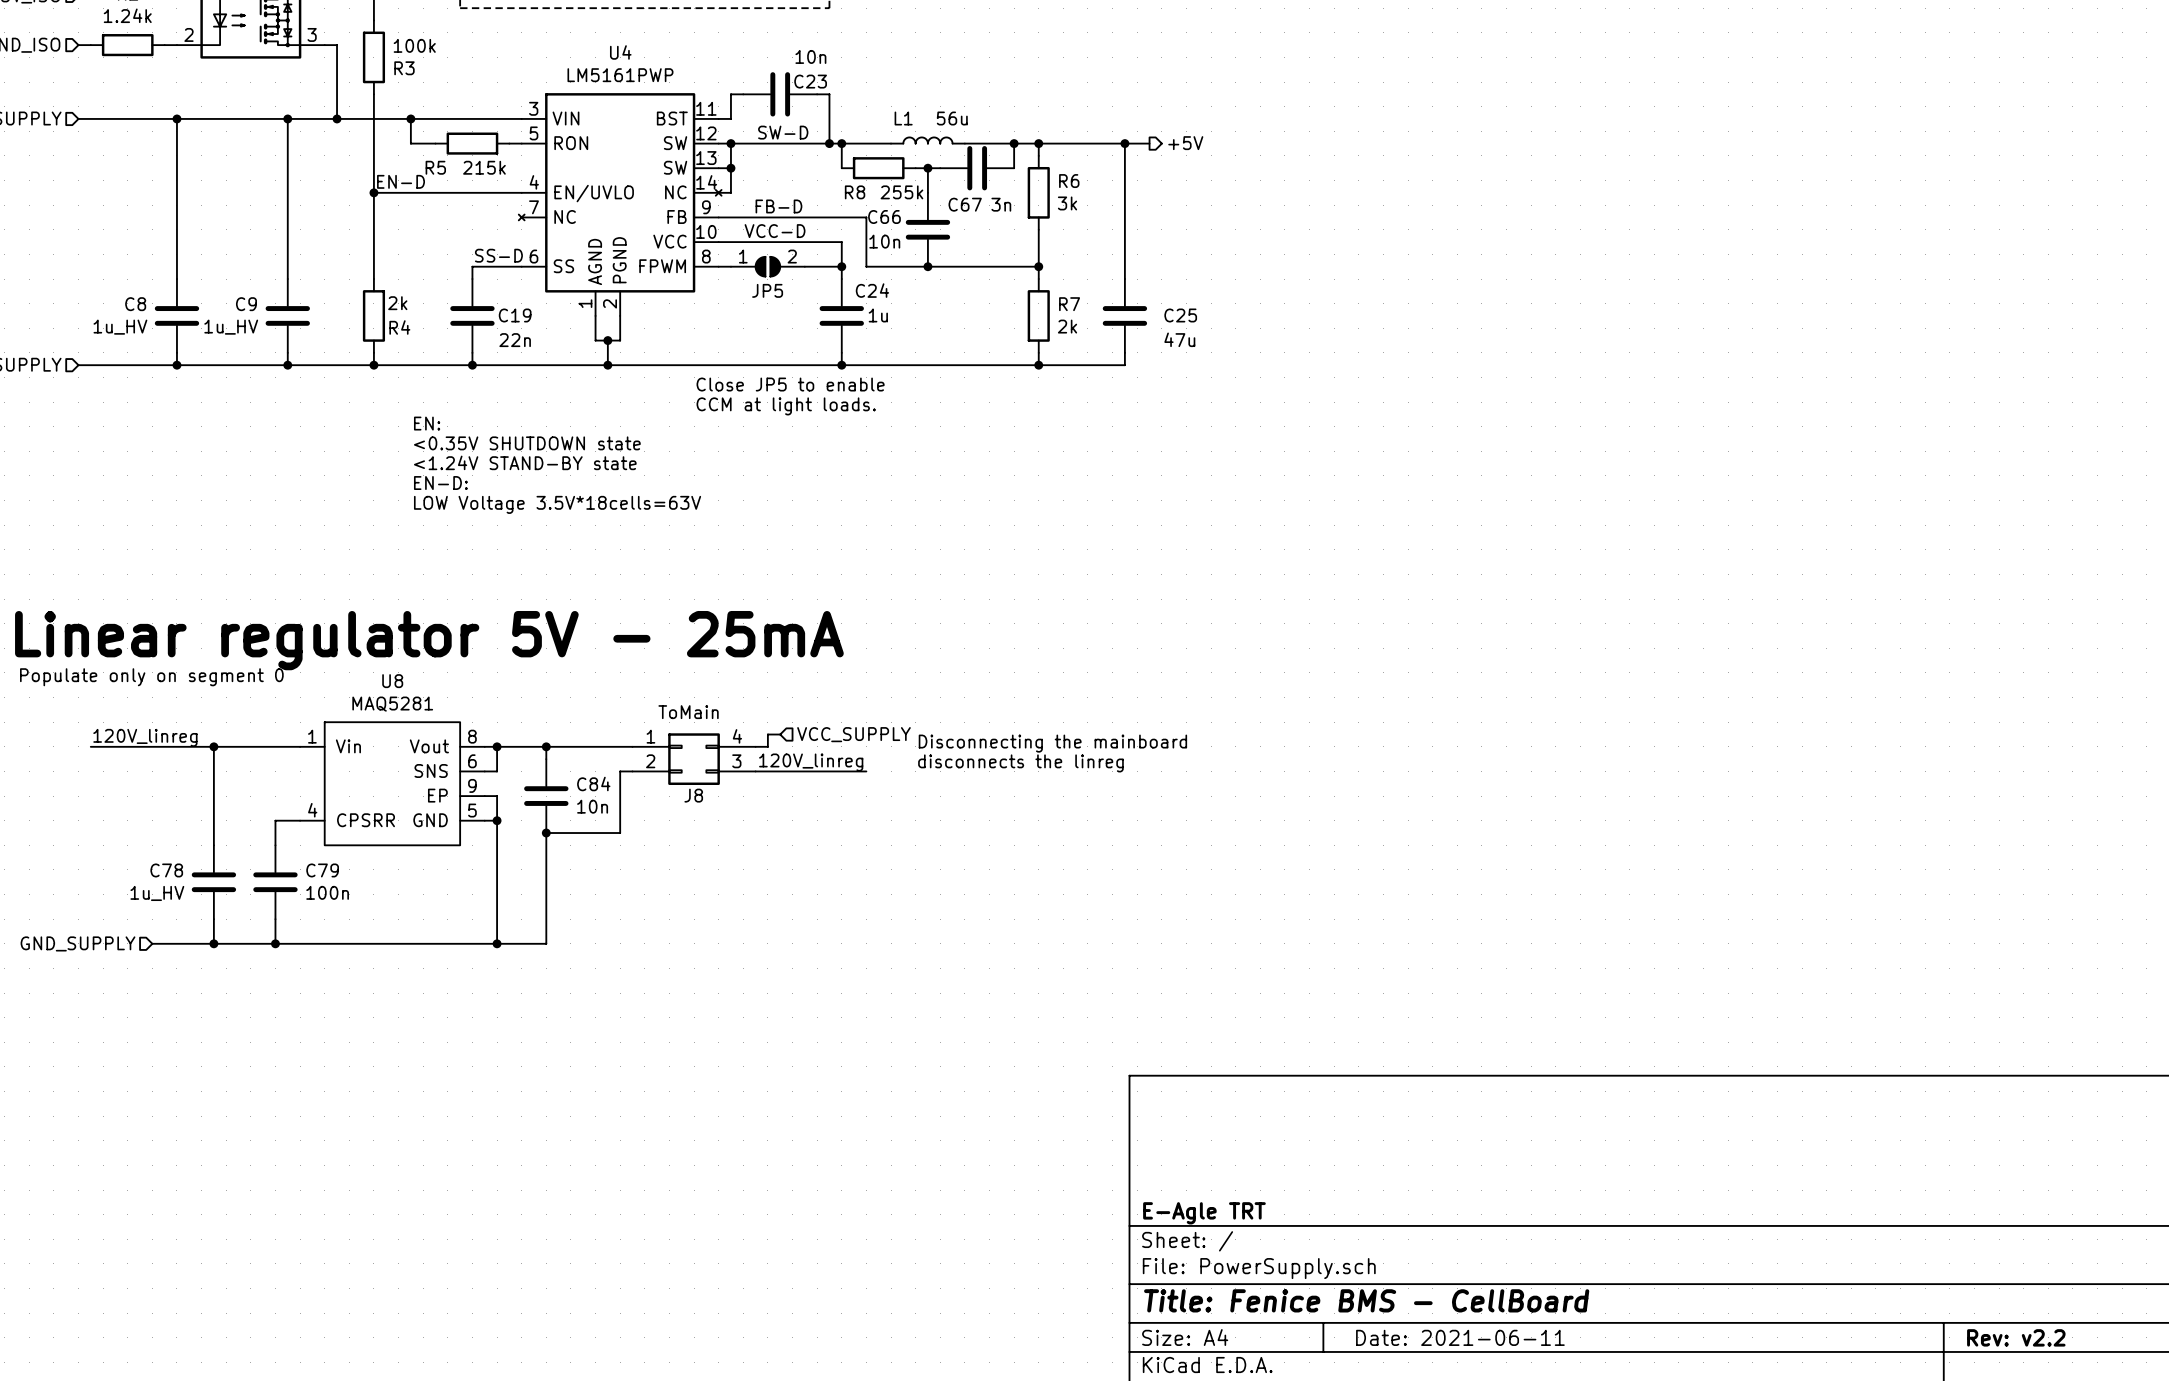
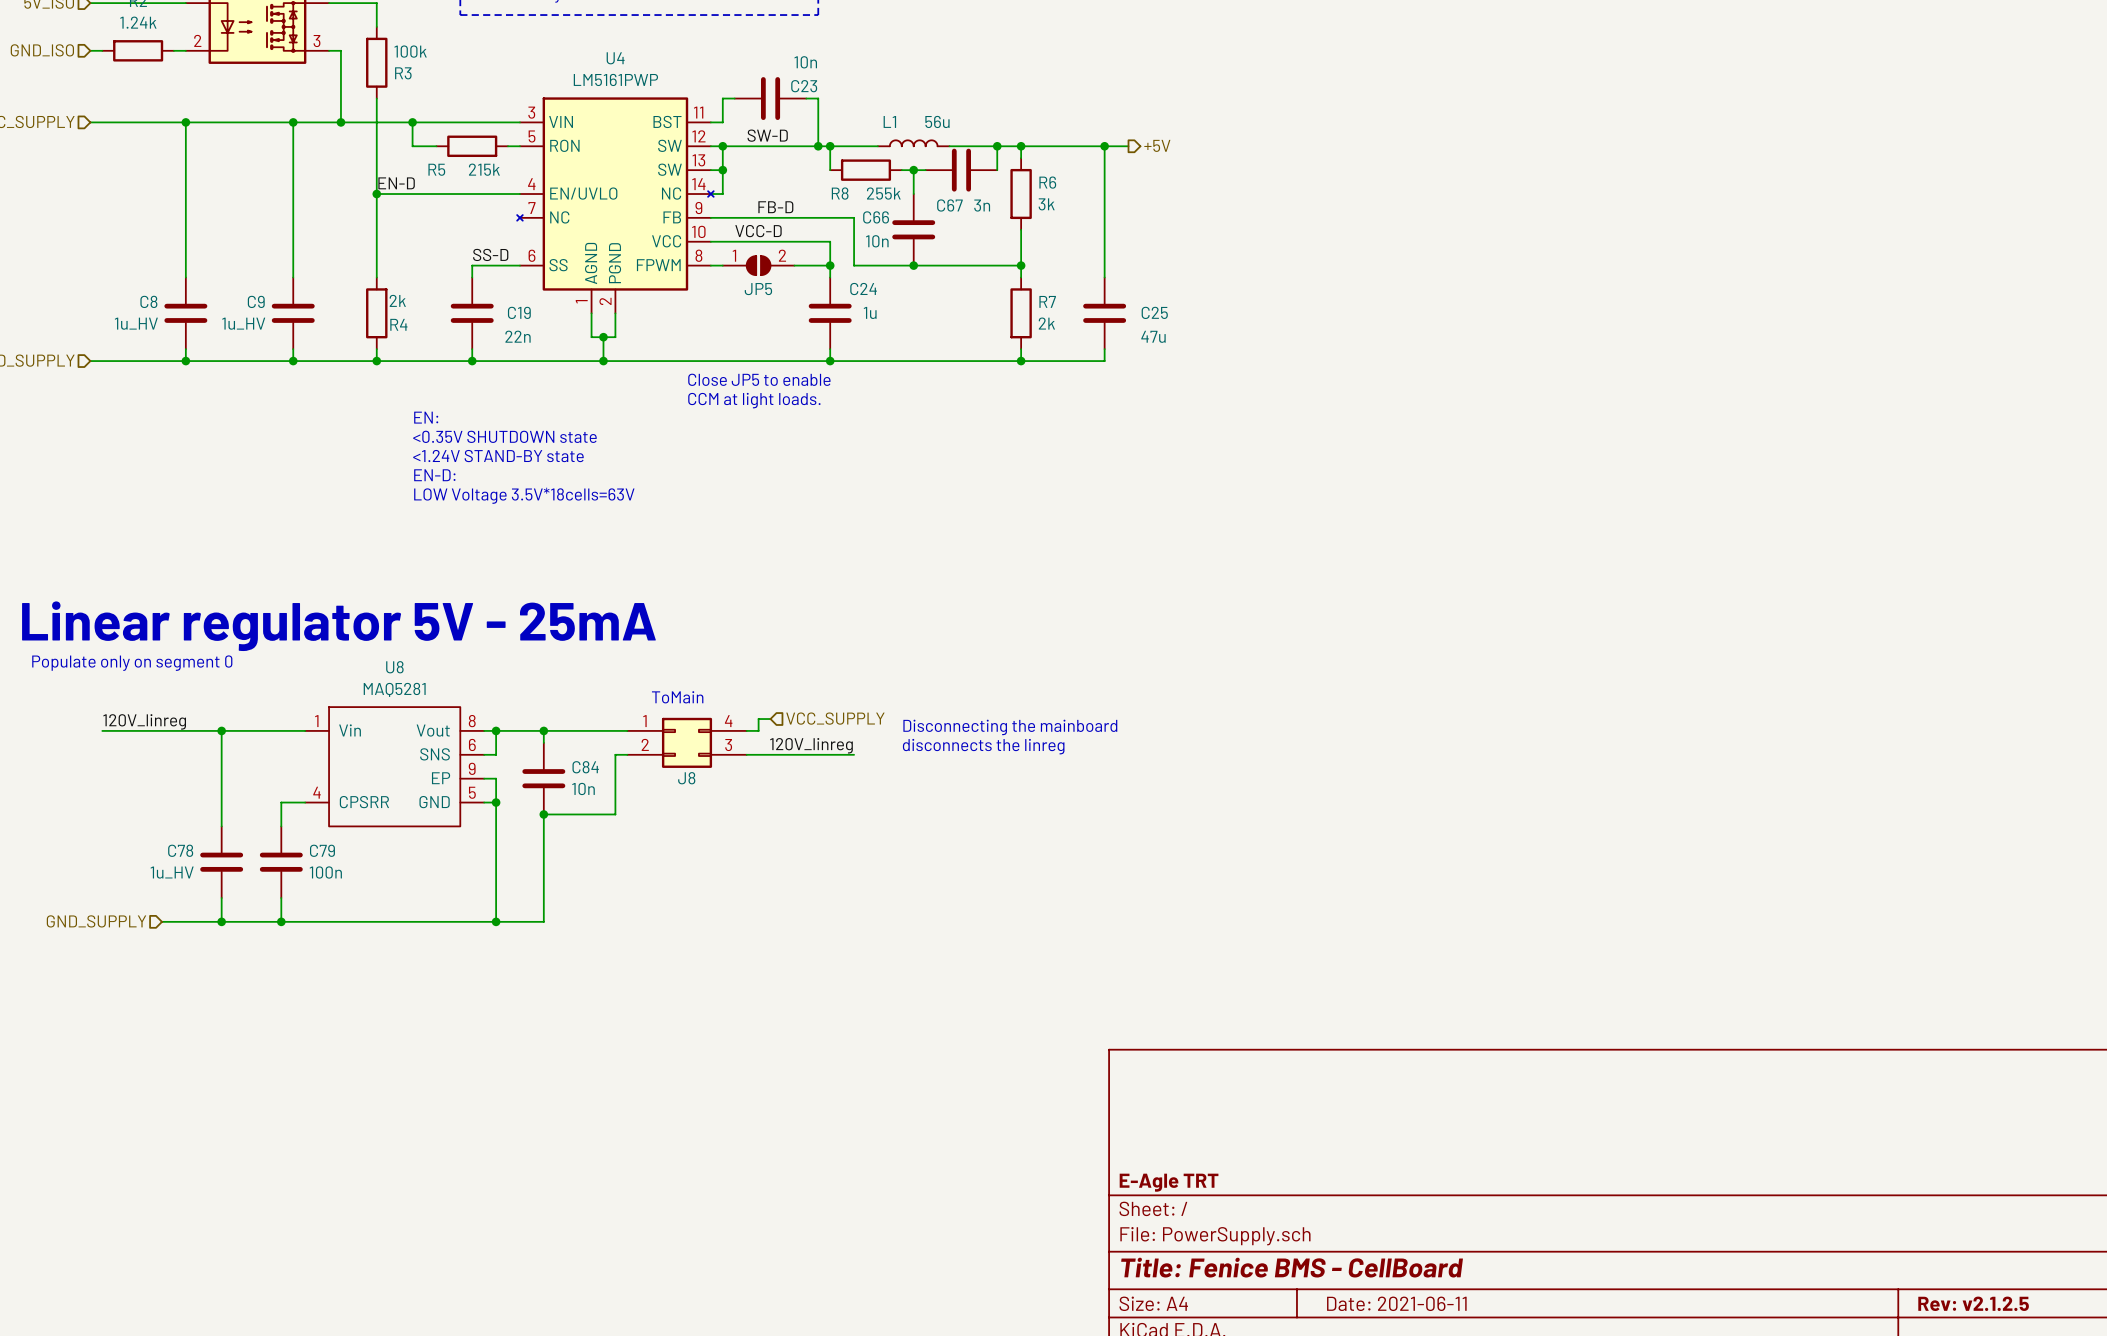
title block: Rev: v2.2 (2016, 1337) -> Rev: v2.1.2.5 (1973, 1303)

